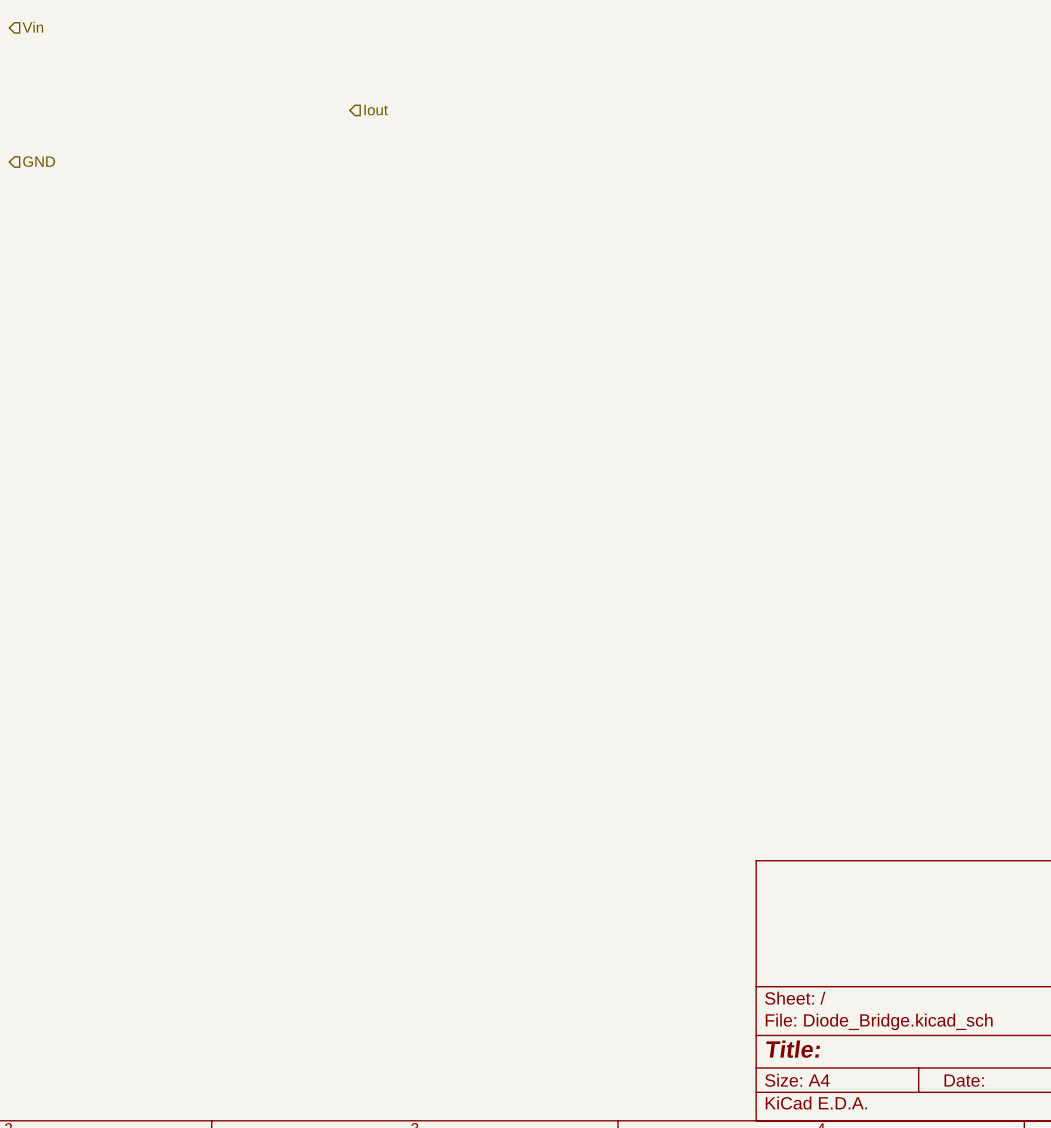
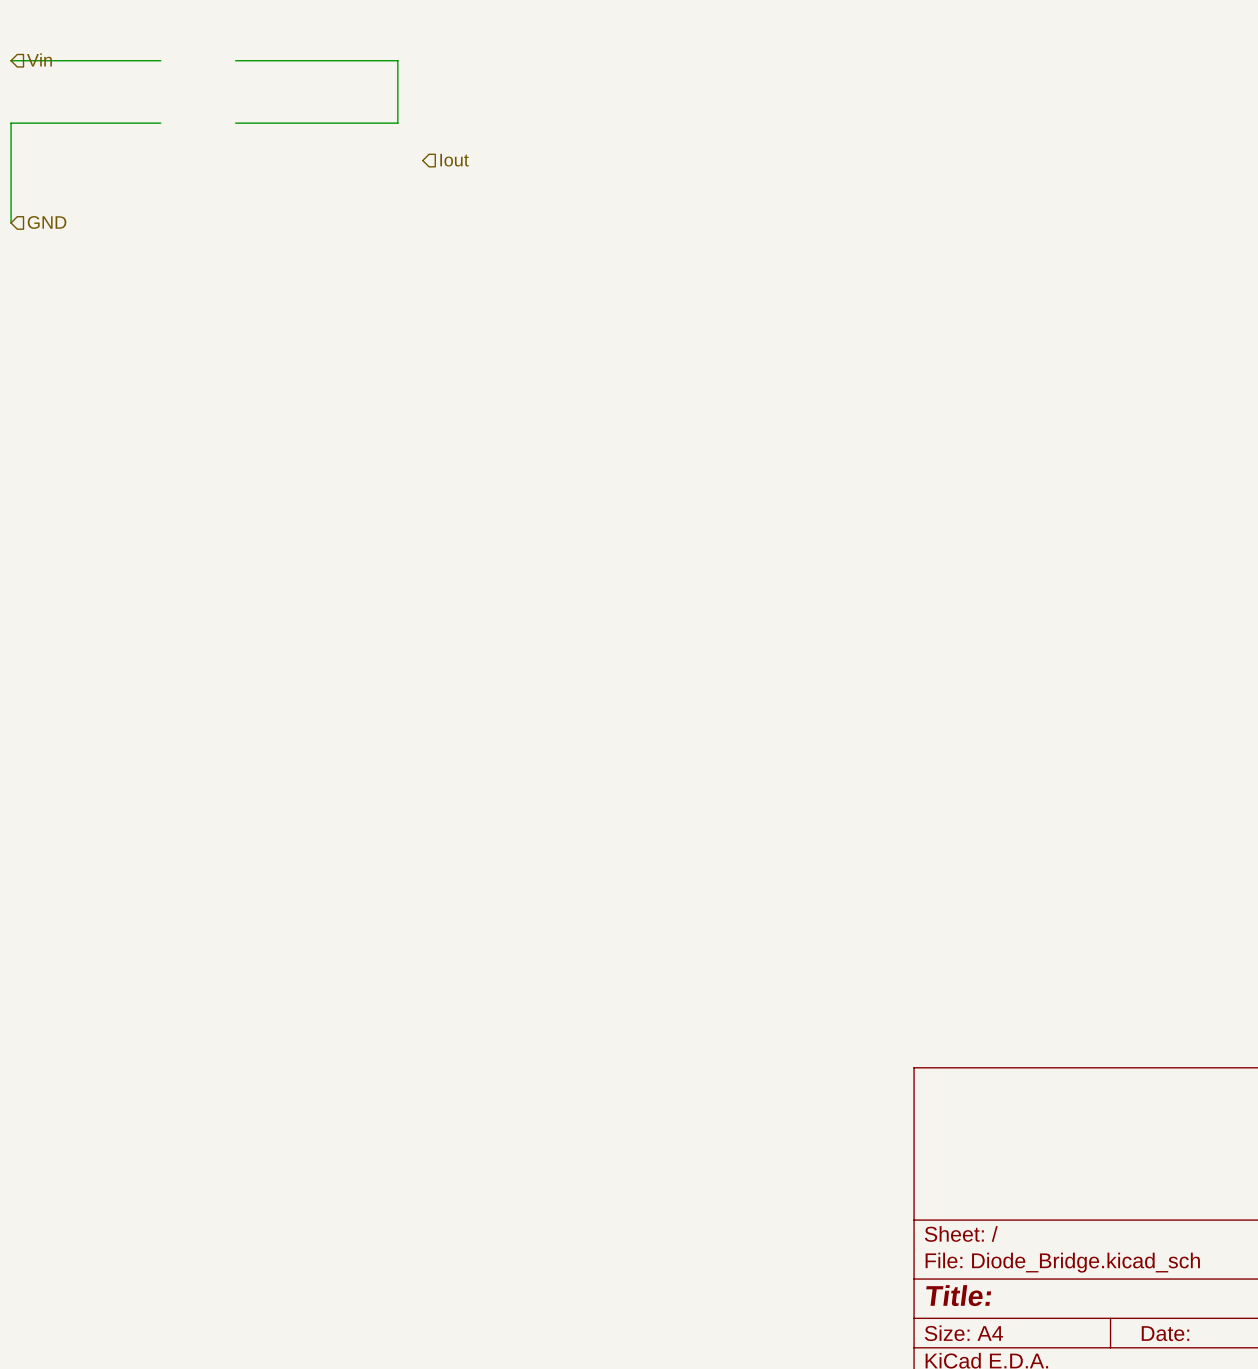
wire: none -> (11, 60) (160, 60)
wire: none -> (235, 60) (397, 60) (397, 123) (235, 123)
wire: none -> (160, 123) (11, 123) (11, 222)

